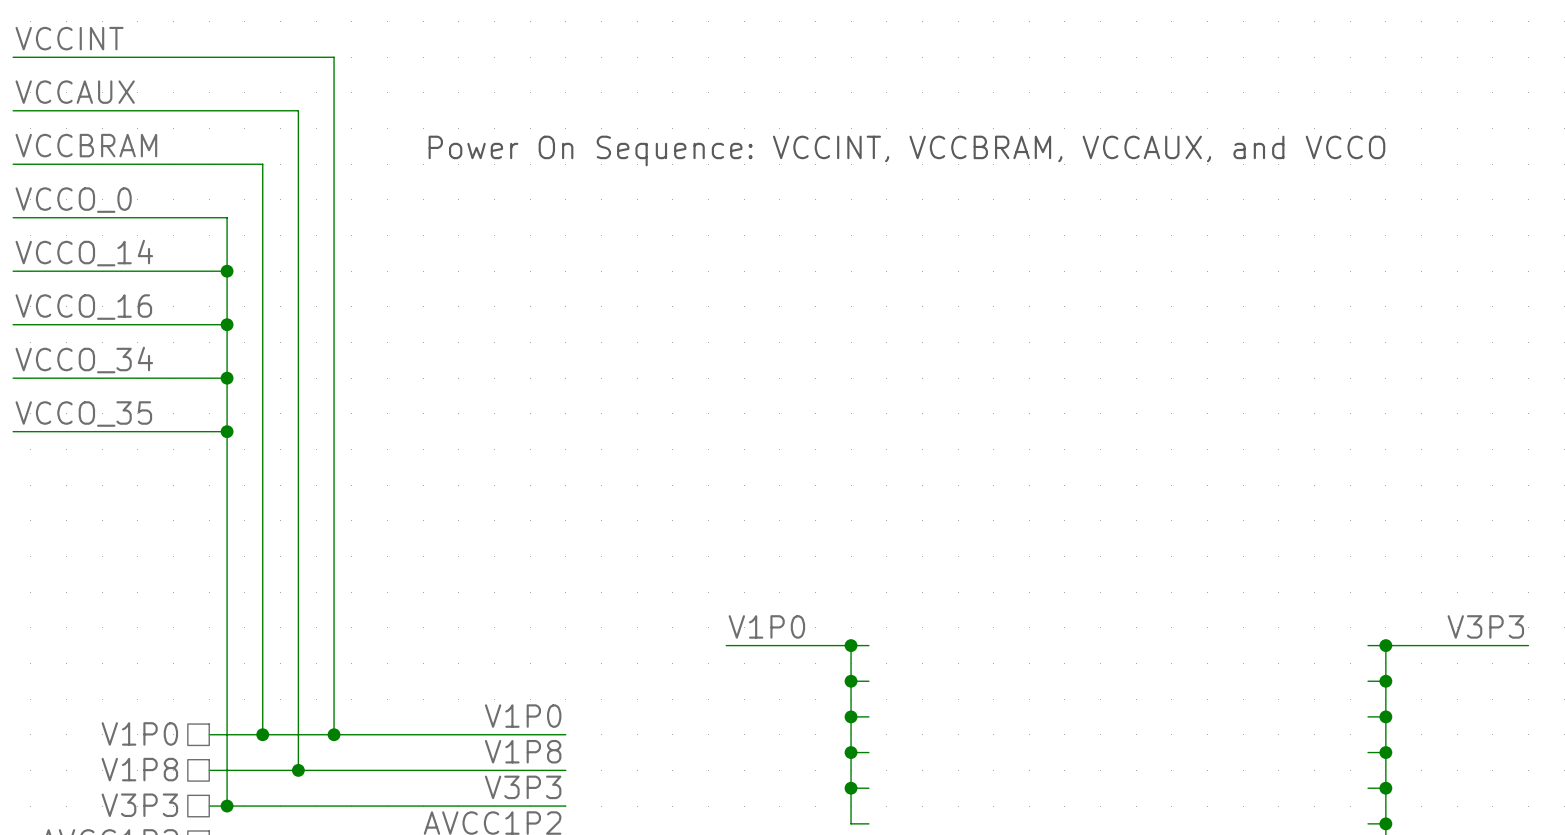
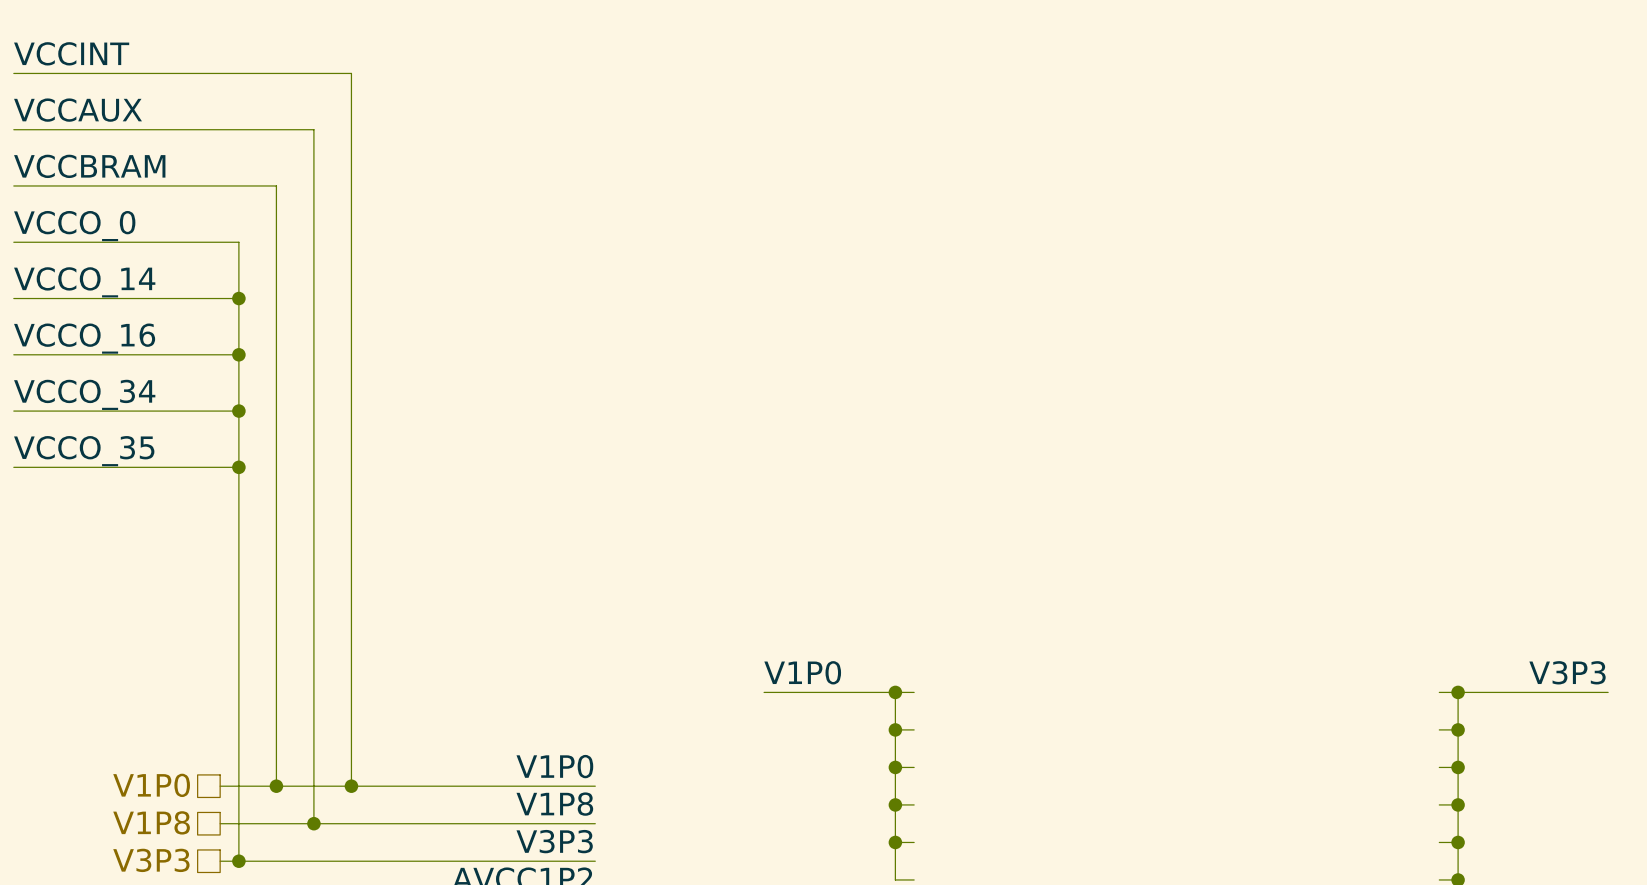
text: Power On Sequence: VCCINT, VCCBRAM, VCCAUX, and VCCO (906, 150) -> none

